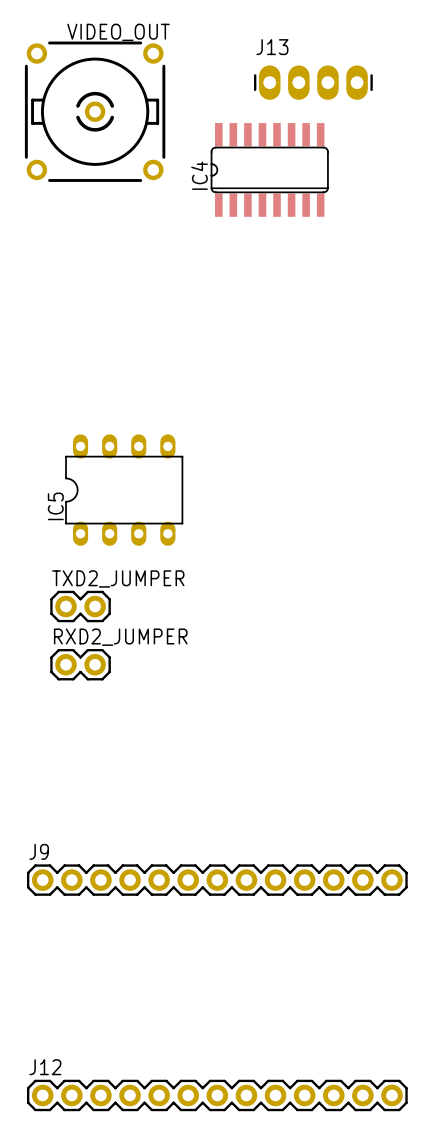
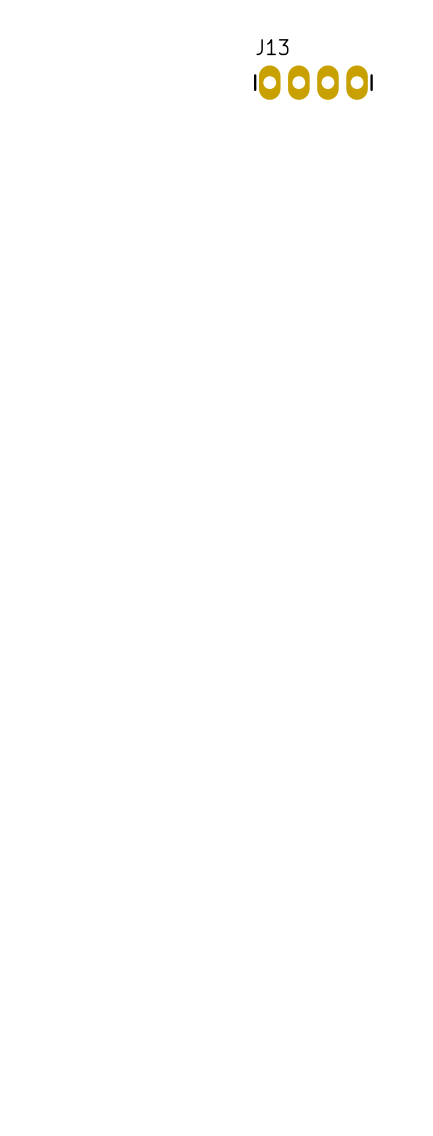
VIDEO_OUT: (95, 111) -> none
IC4: (269, 169) -> none
IC5: (124, 490) -> none
TXD2_JUMPER: (80, 606) -> none
RXD2_JUMPER: (80, 664) -> none
J9: (217, 880) -> none
J12: (217, 1095) -> none

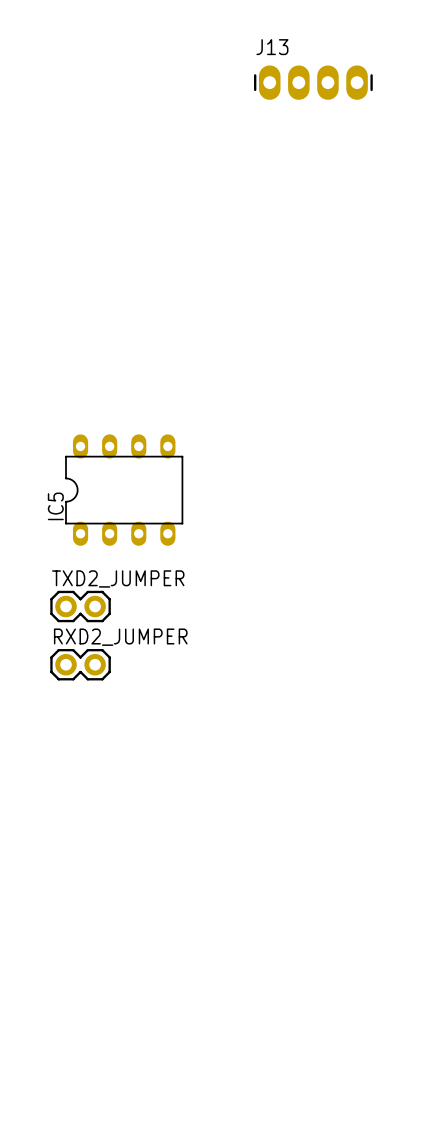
IC5: none -> (124, 490)
TXD2_JUMPER: none -> (80, 606)
RXD2_JUMPER: none -> (80, 664)

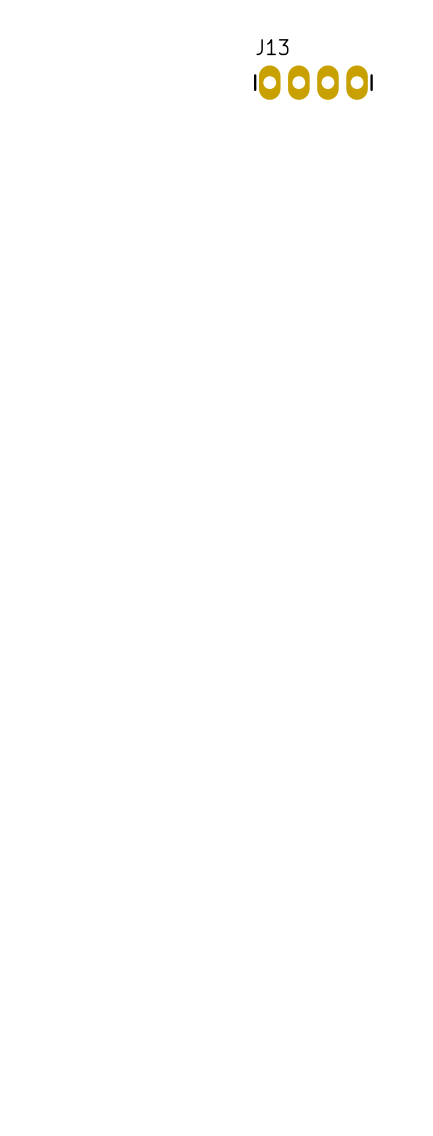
IC5: (124, 490) -> none
TXD2_JUMPER: (80, 606) -> none
RXD2_JUMPER: (80, 664) -> none

